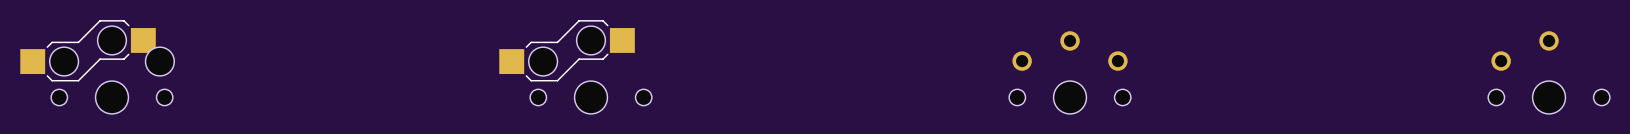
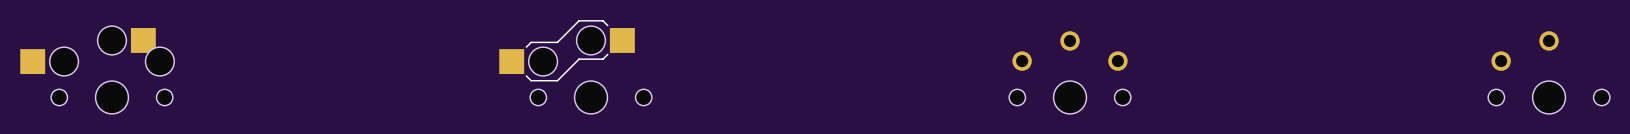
part footprint: [20, 20, 175, 114] -> [20, 26, 175, 114]

